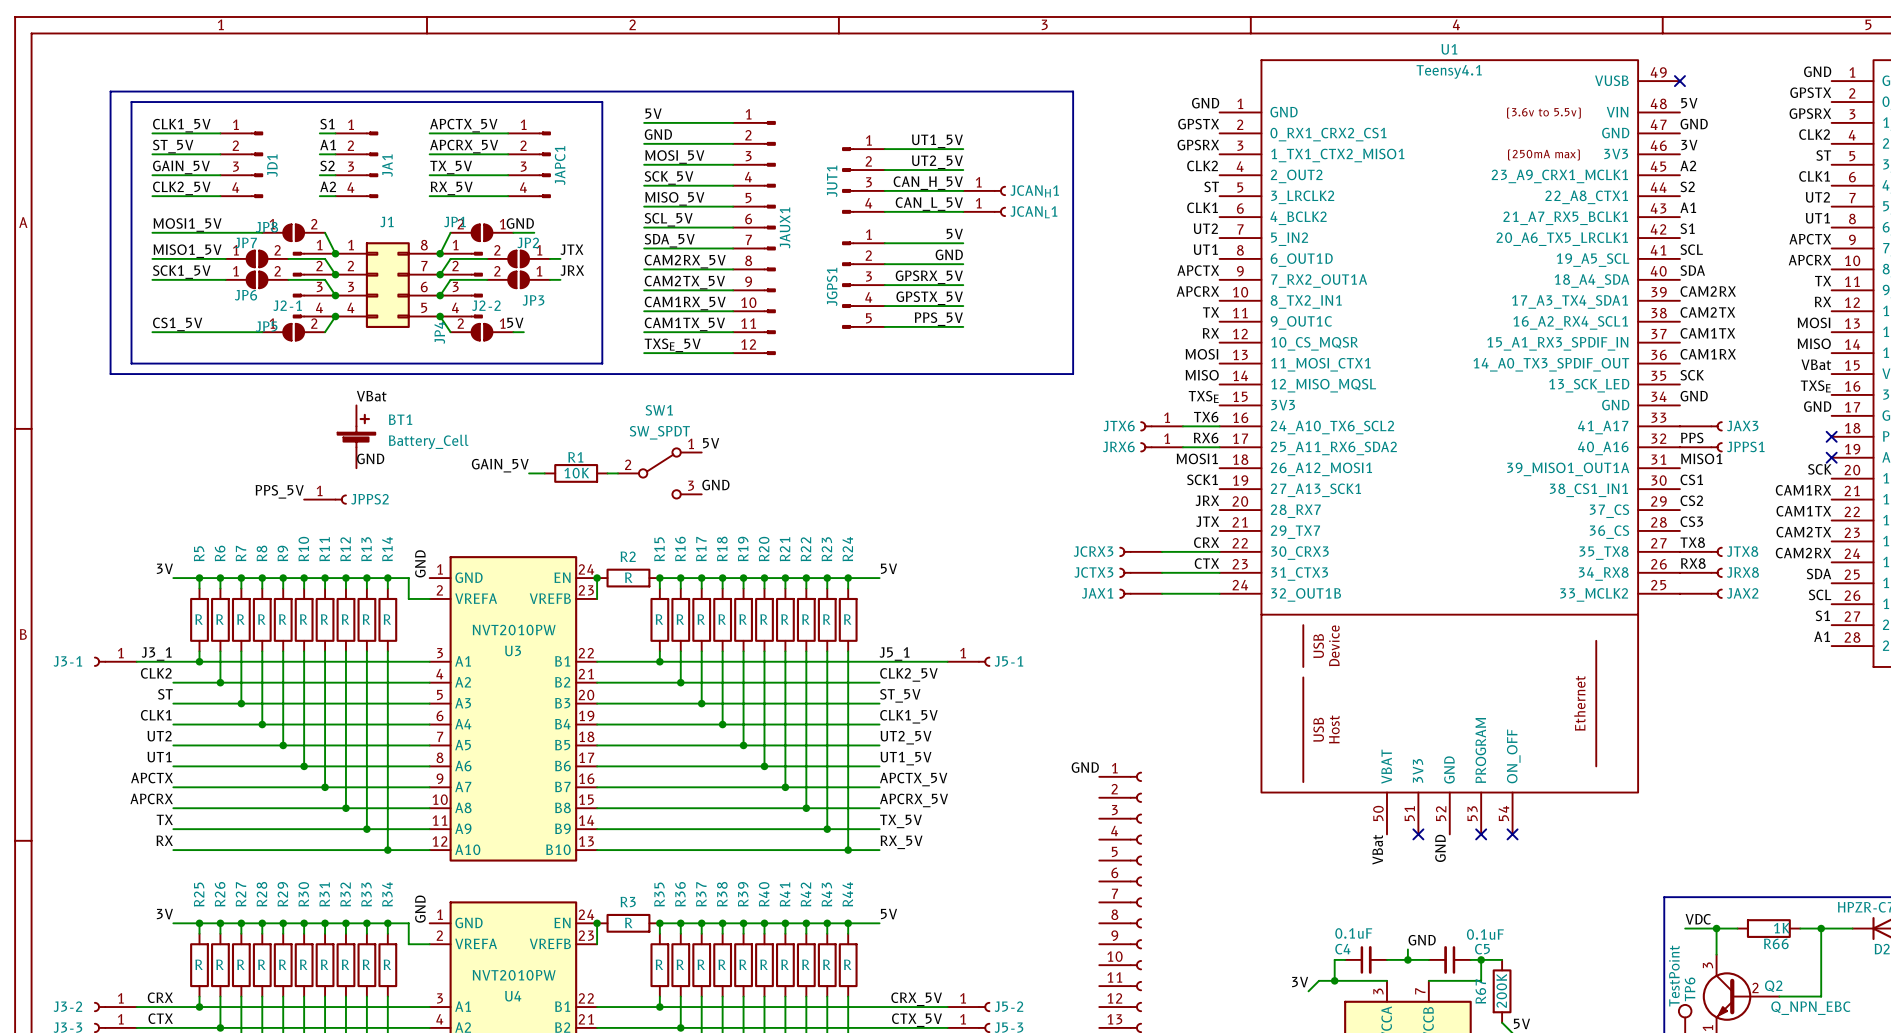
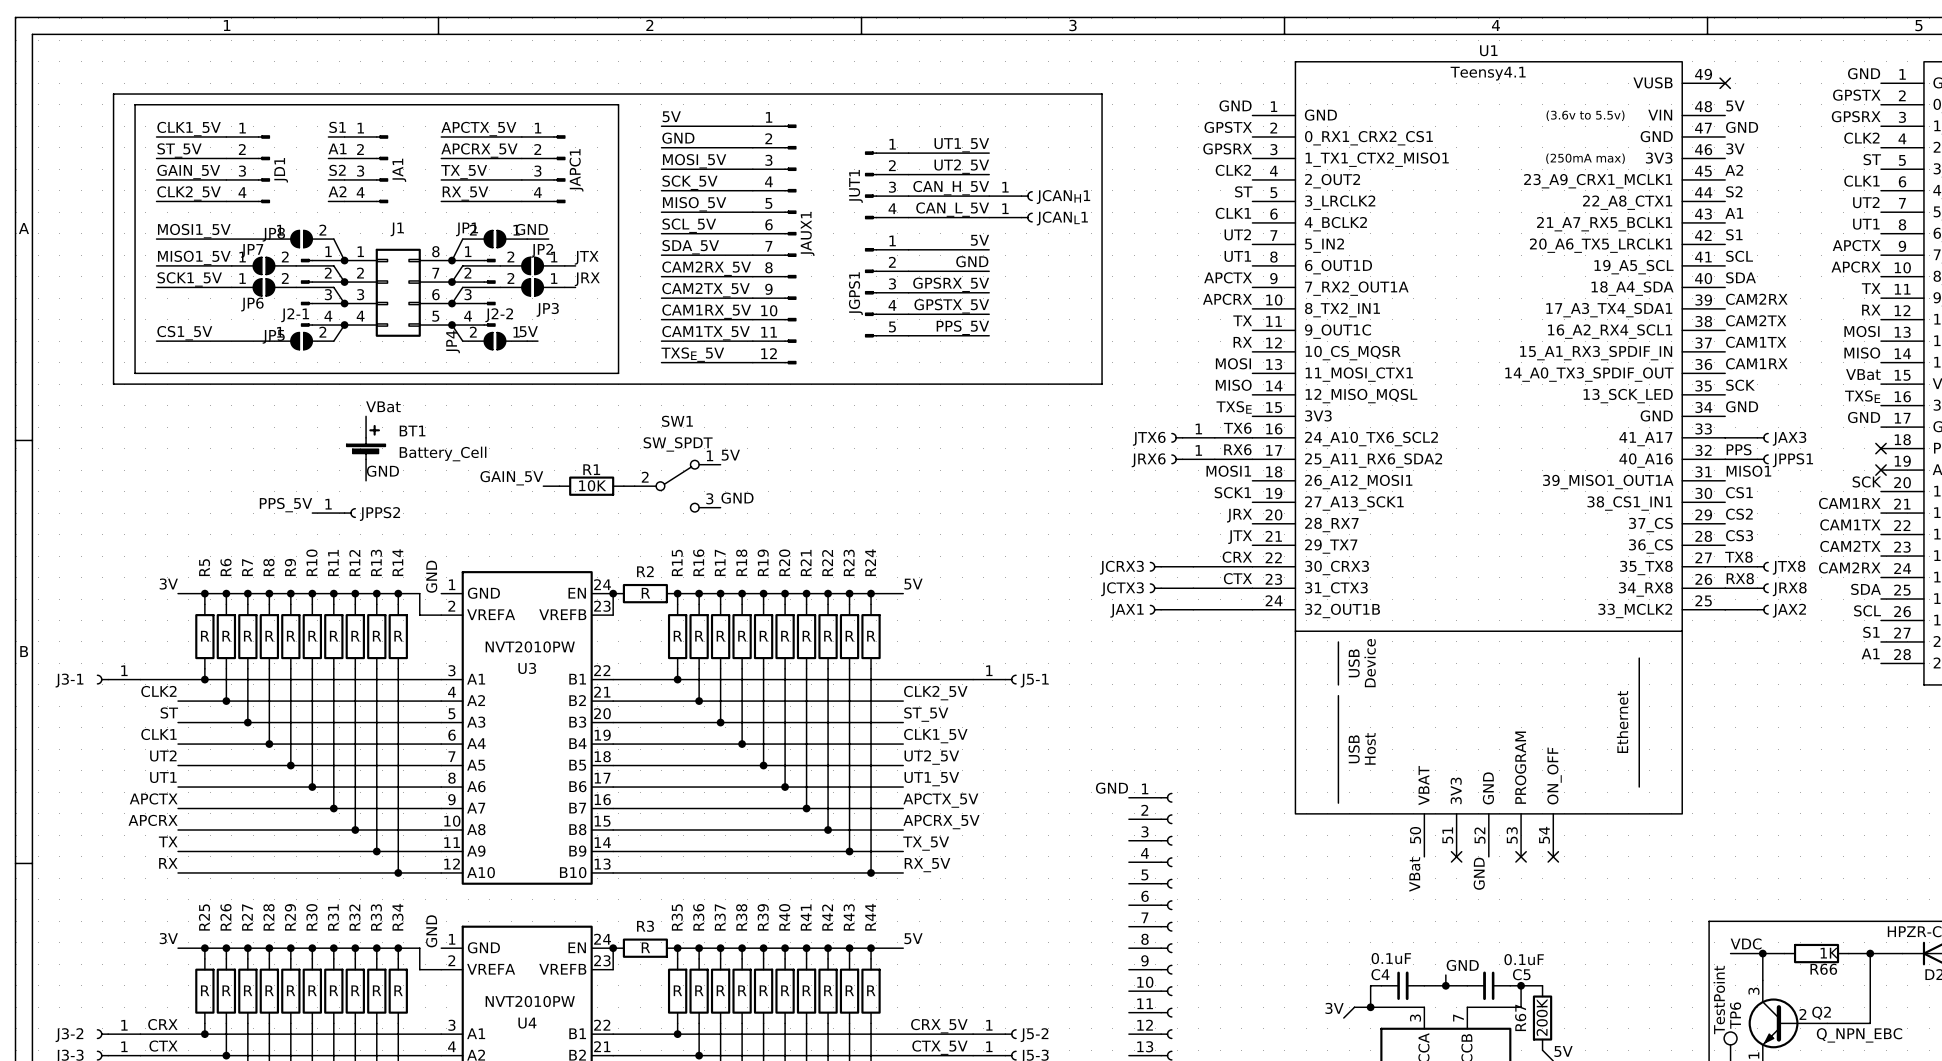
label: J3_1 (156, 653) -> none
label: J5_1 (894, 653) -> none

